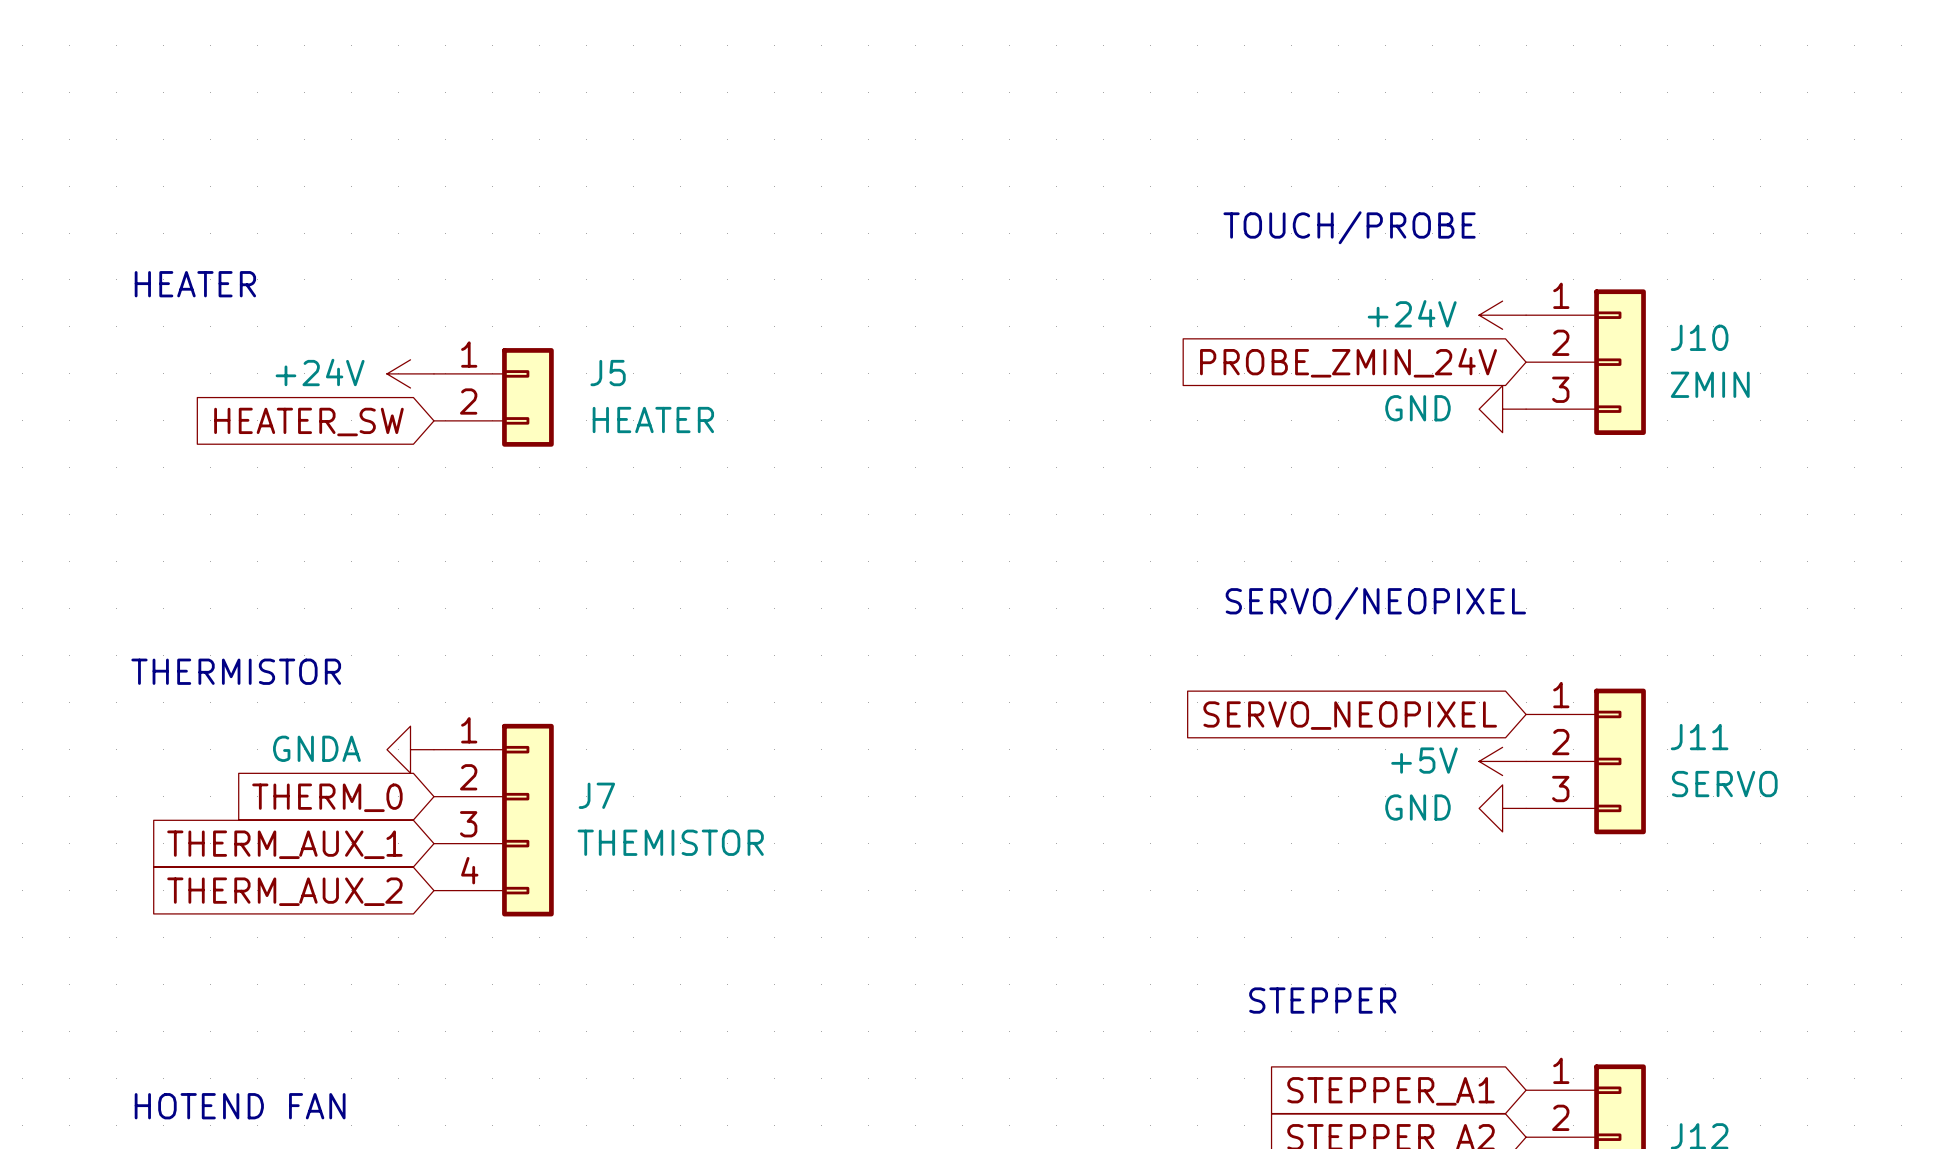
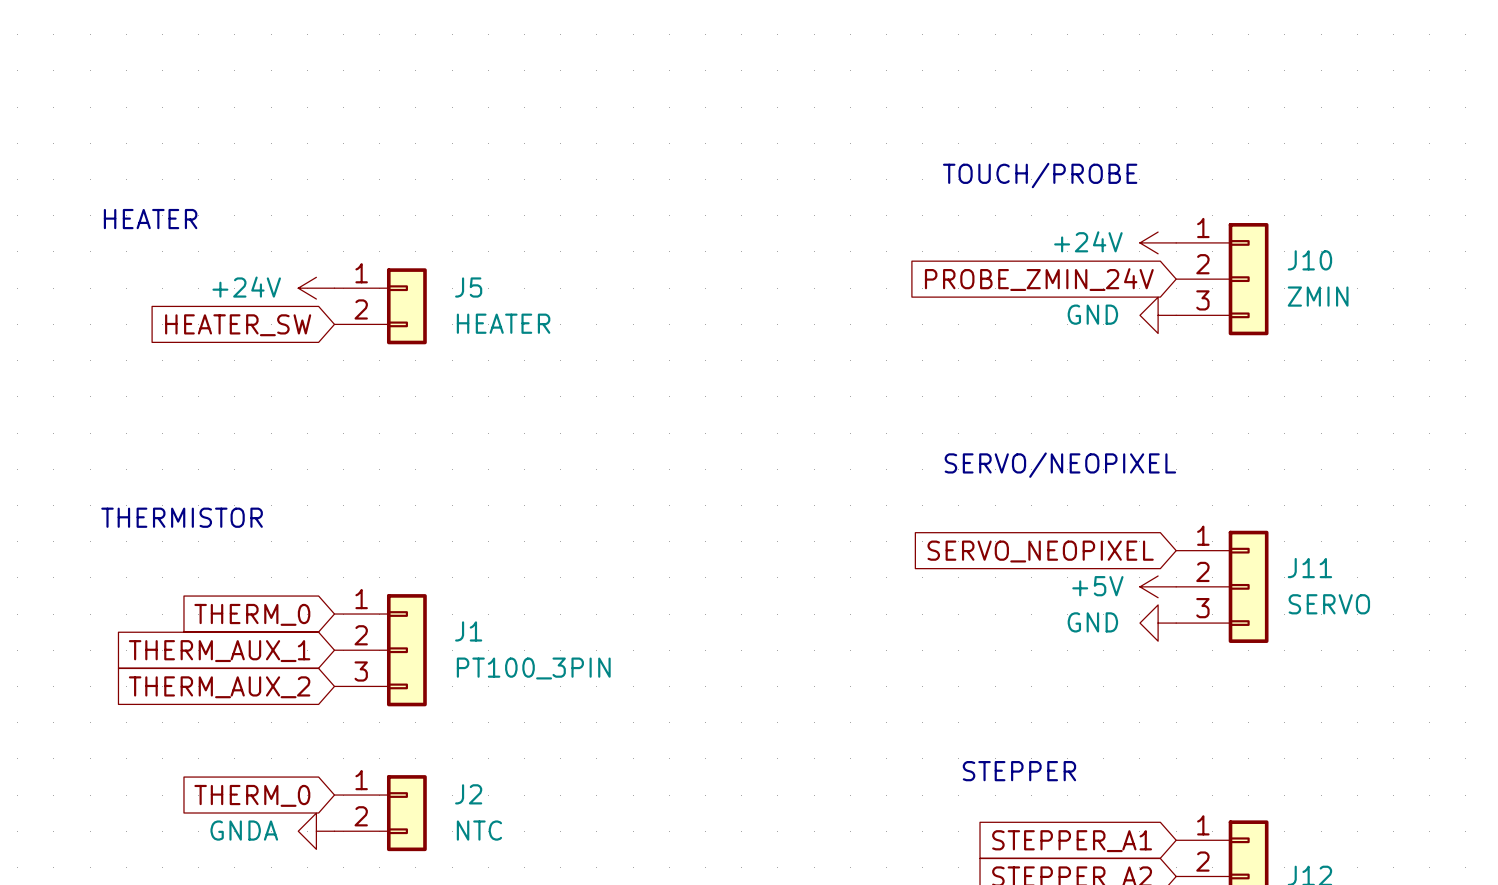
power symbol position: GNDA (410, 749) -> GNDA (316, 831)
J7: THEMISTOR (493, 820) -> none
J1: none -> PT100_3PIN (380, 650)
global label: none -> THERM_0 (252, 795)
J2: none -> NTC (380, 813)
text: HOTEND FAN (240, 1106) -> none

